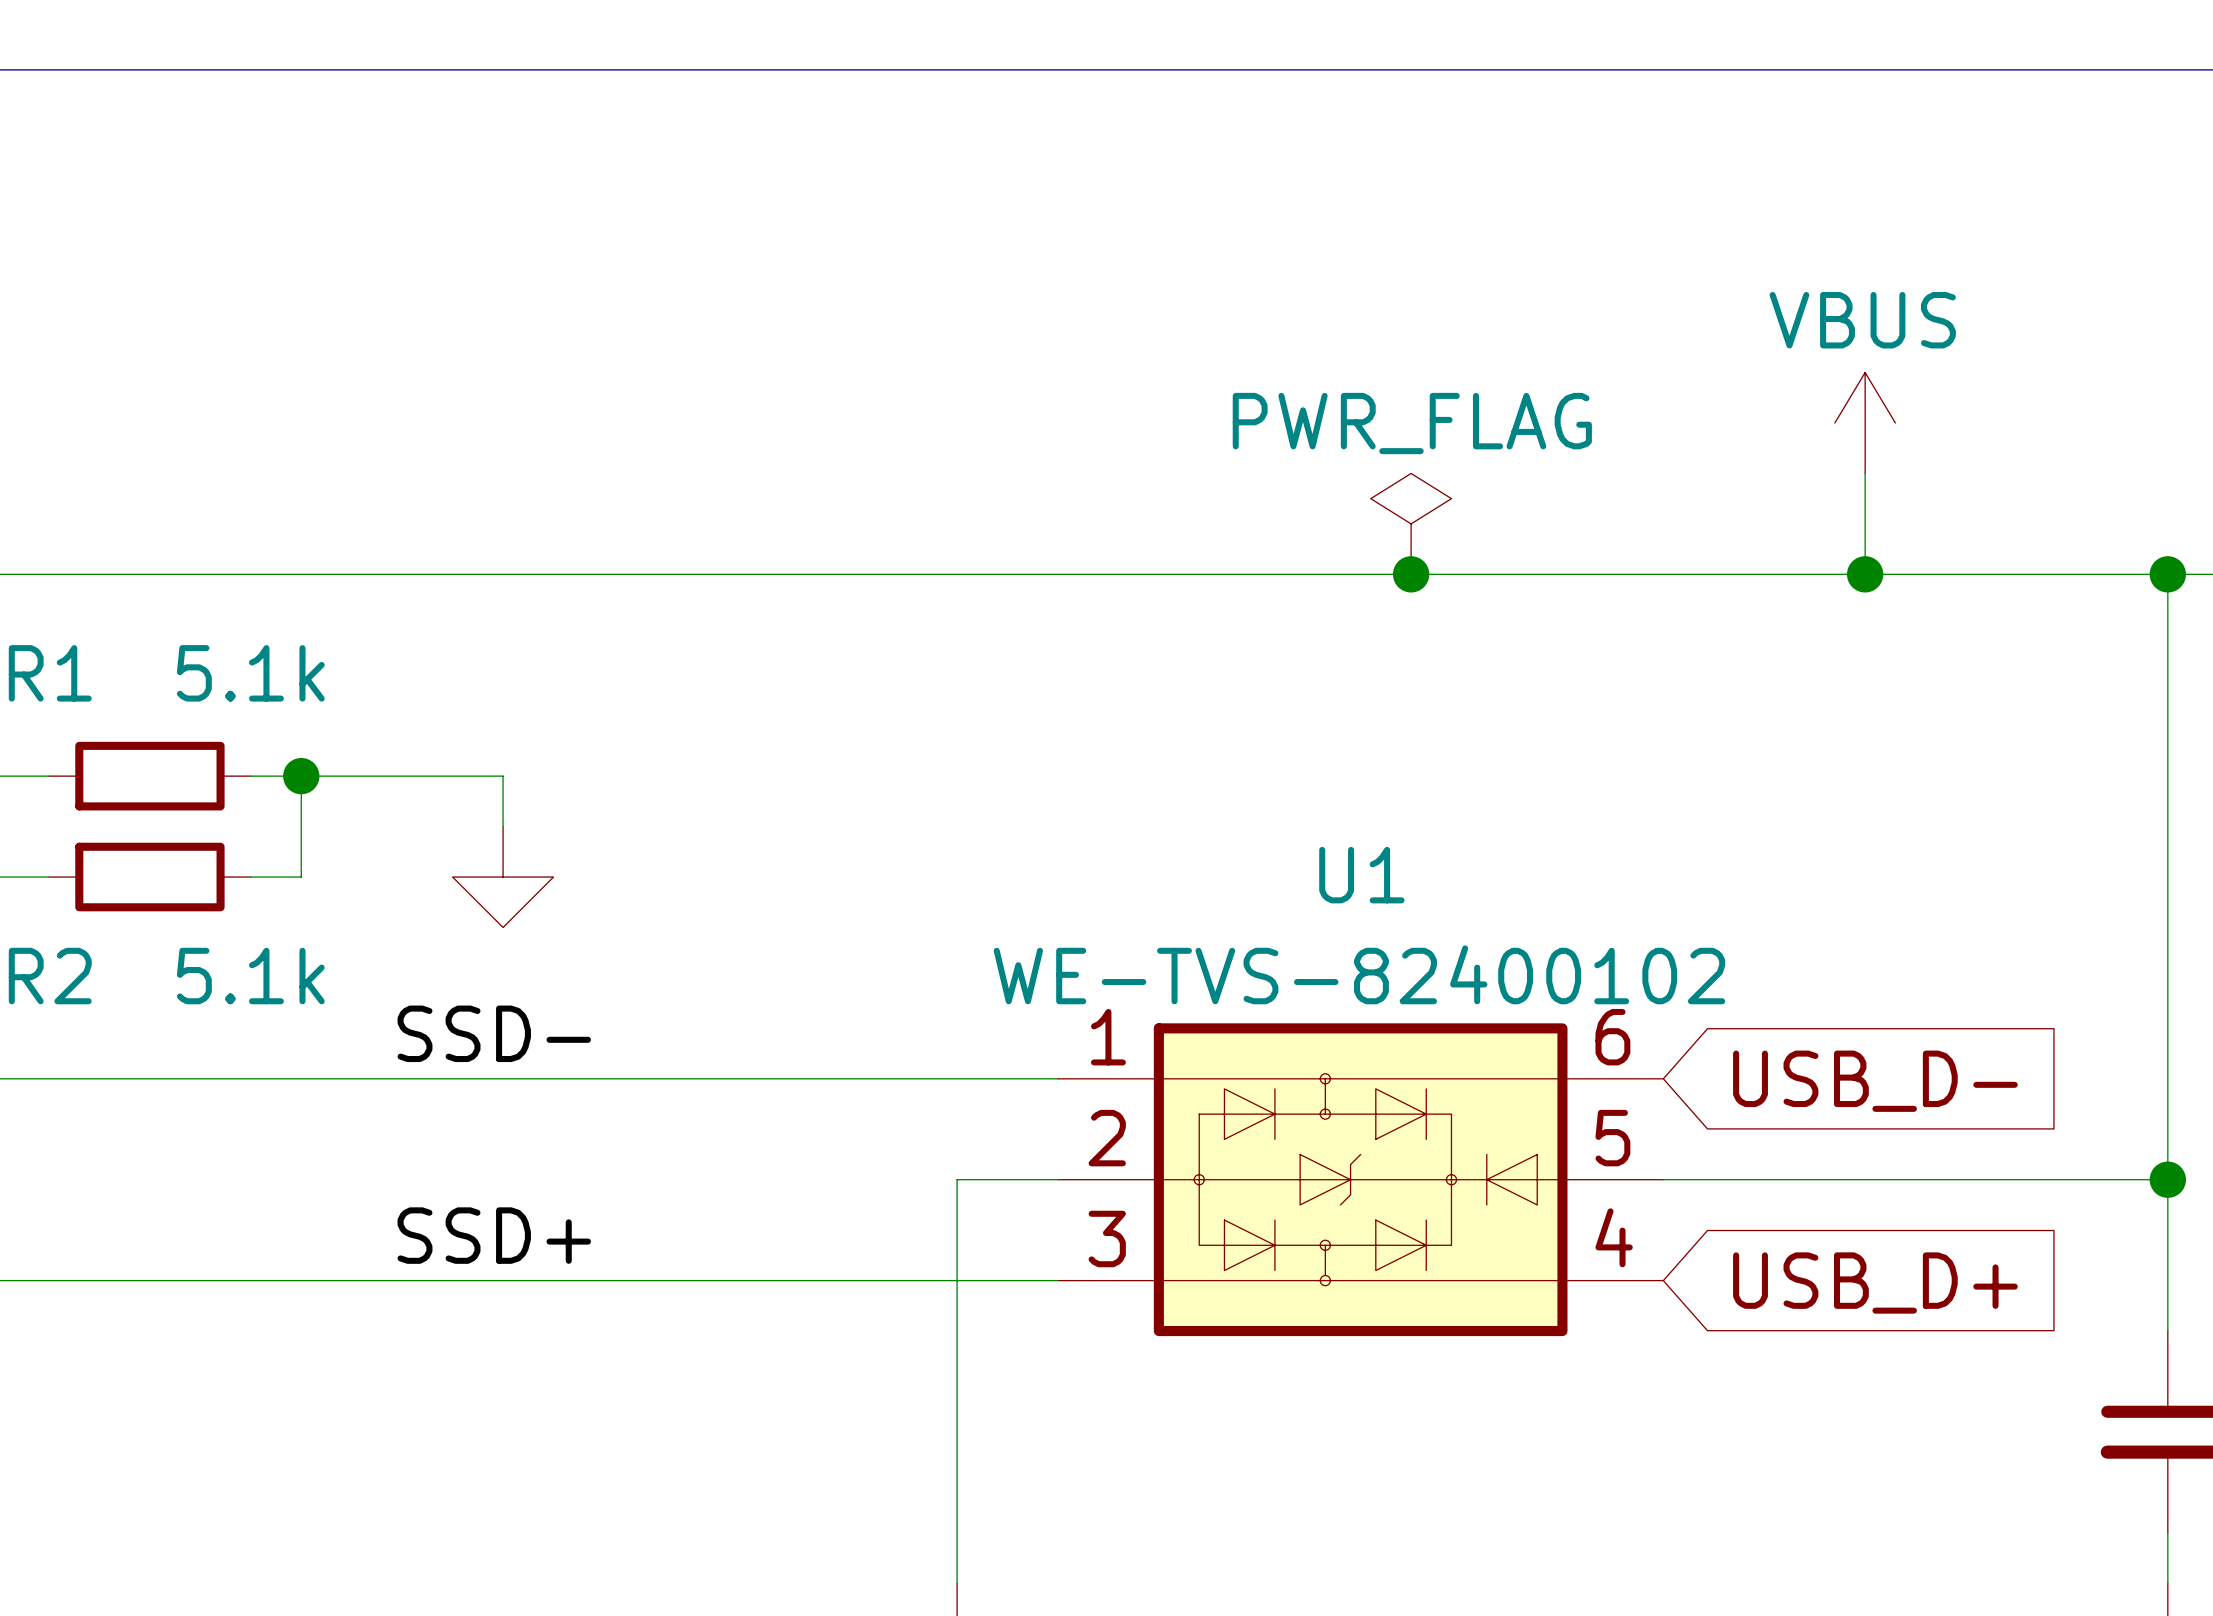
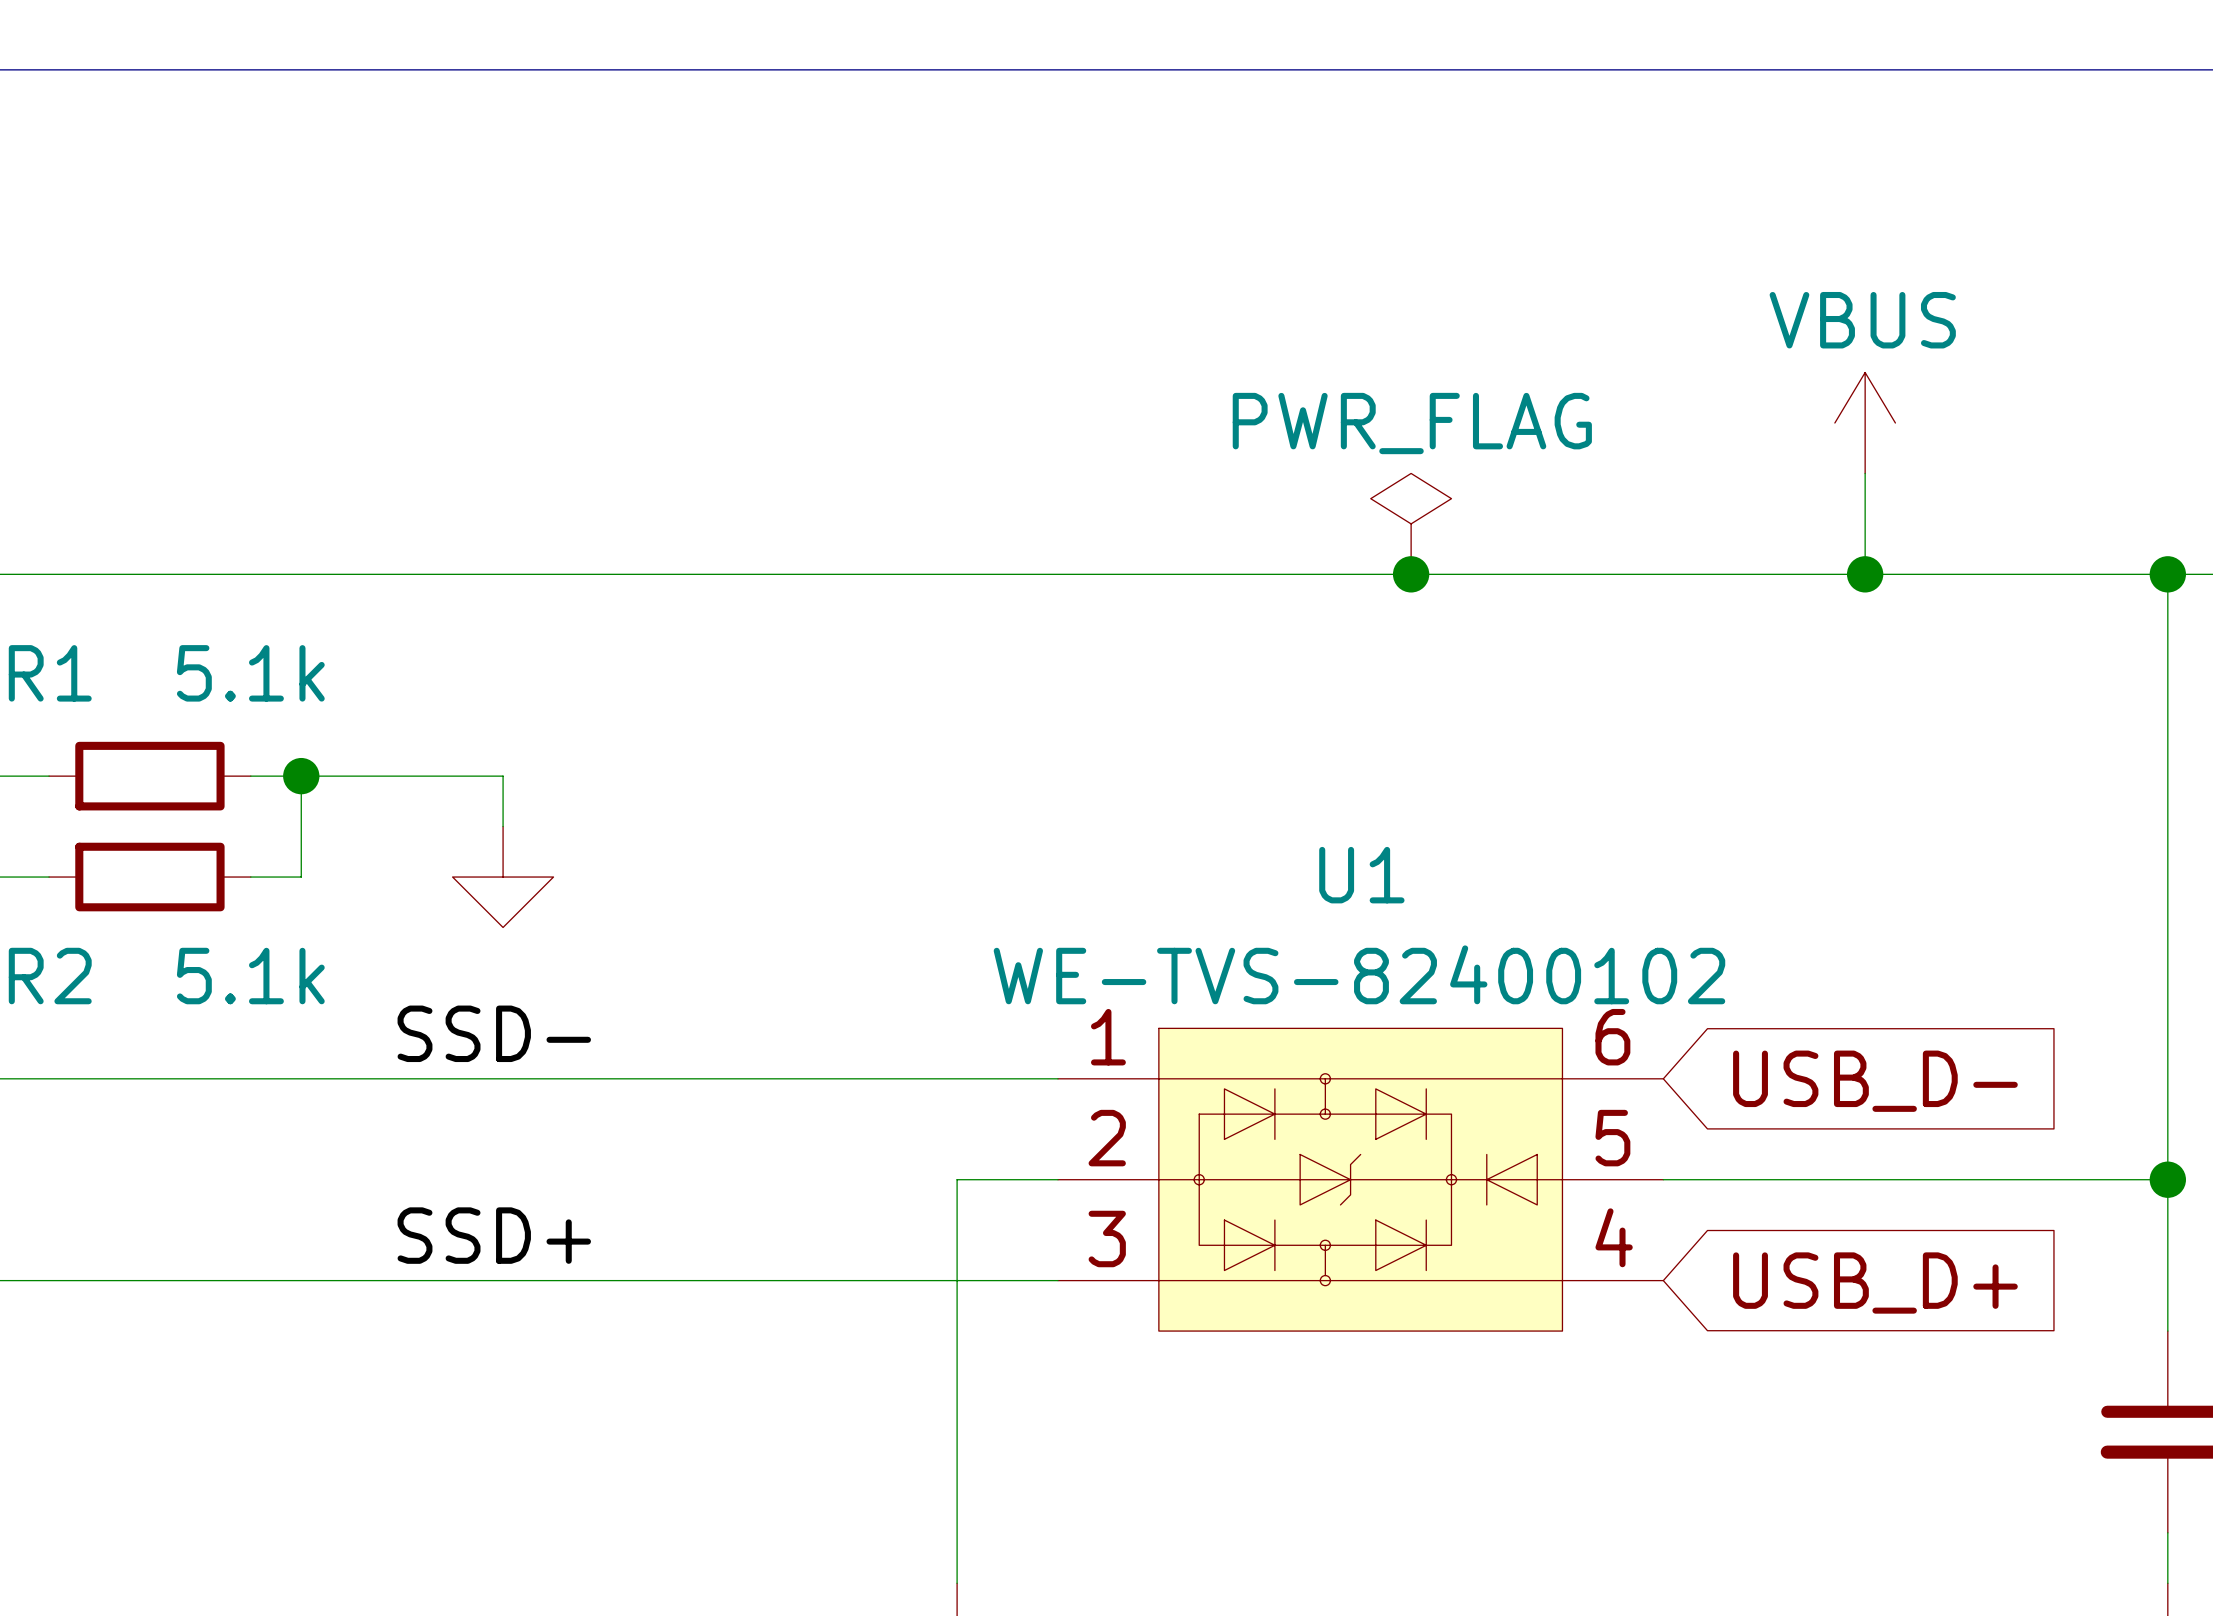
U1 symbol: [1057, 1023, 1664, 1337] -> [1057, 1028, 1664, 1332]

